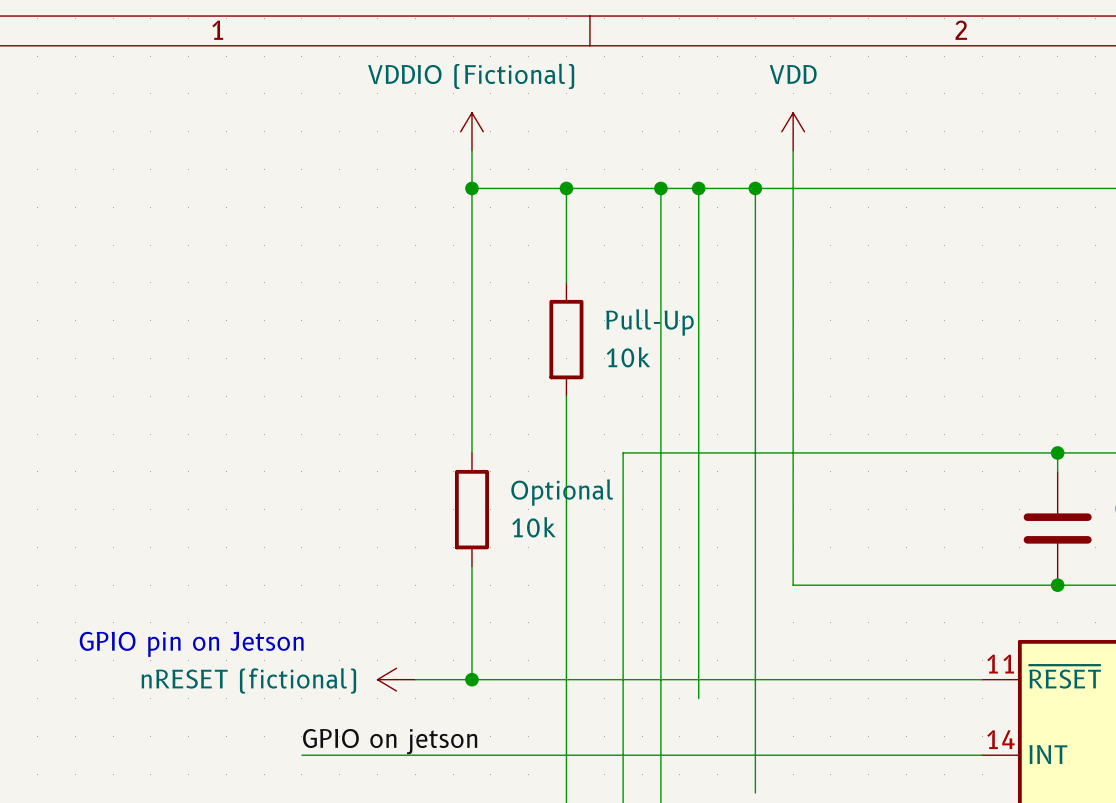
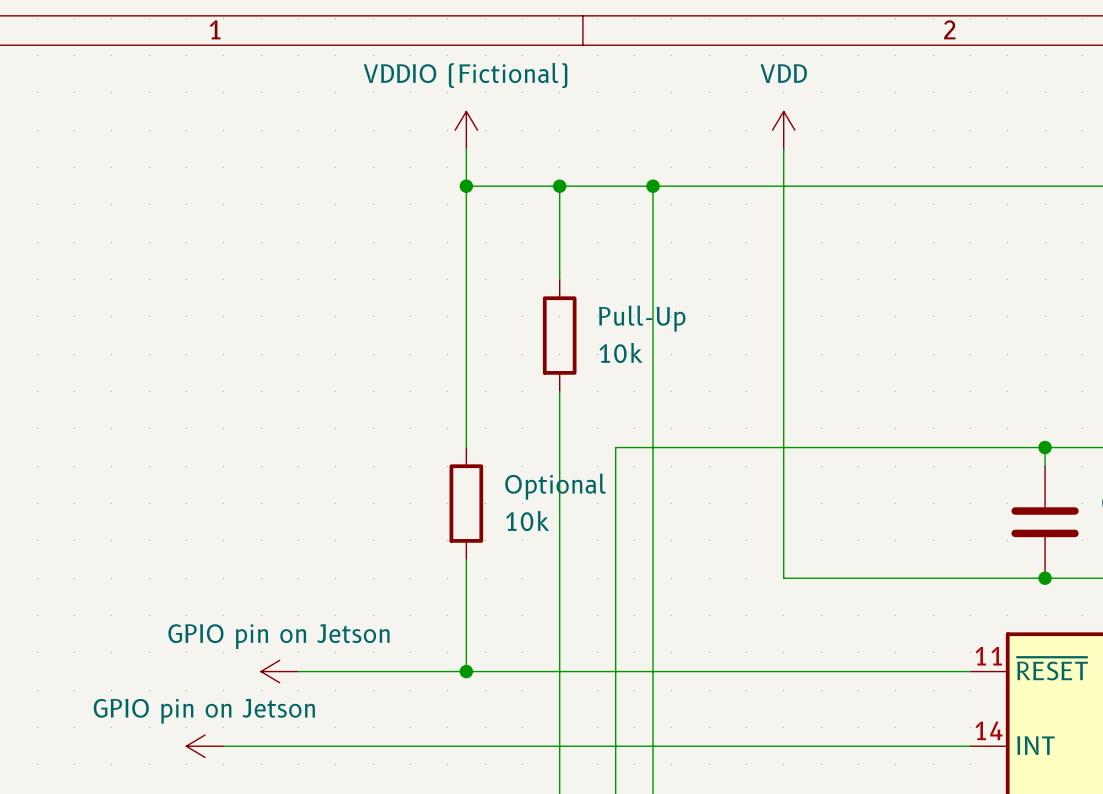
wire: (698, 188) (698, 698) -> none
junction: (698, 188) -> none
wire: (755, 188) (755, 793) -> none
junction: (755, 188) -> none
text: GPIO pin on Jetson (191, 644) -> none
power symbol: none -> GPIO pin on Jetson (279, 671)
wire: none -> (298, 671) (410, 671)
power symbol: nRESET (fictional) (396, 679) -> none
label: GPIO on jetson (390, 741) -> none
power symbol: none -> GPIO pin on Jetson (205, 746)
wire: none -> (223, 746) (298, 746)

